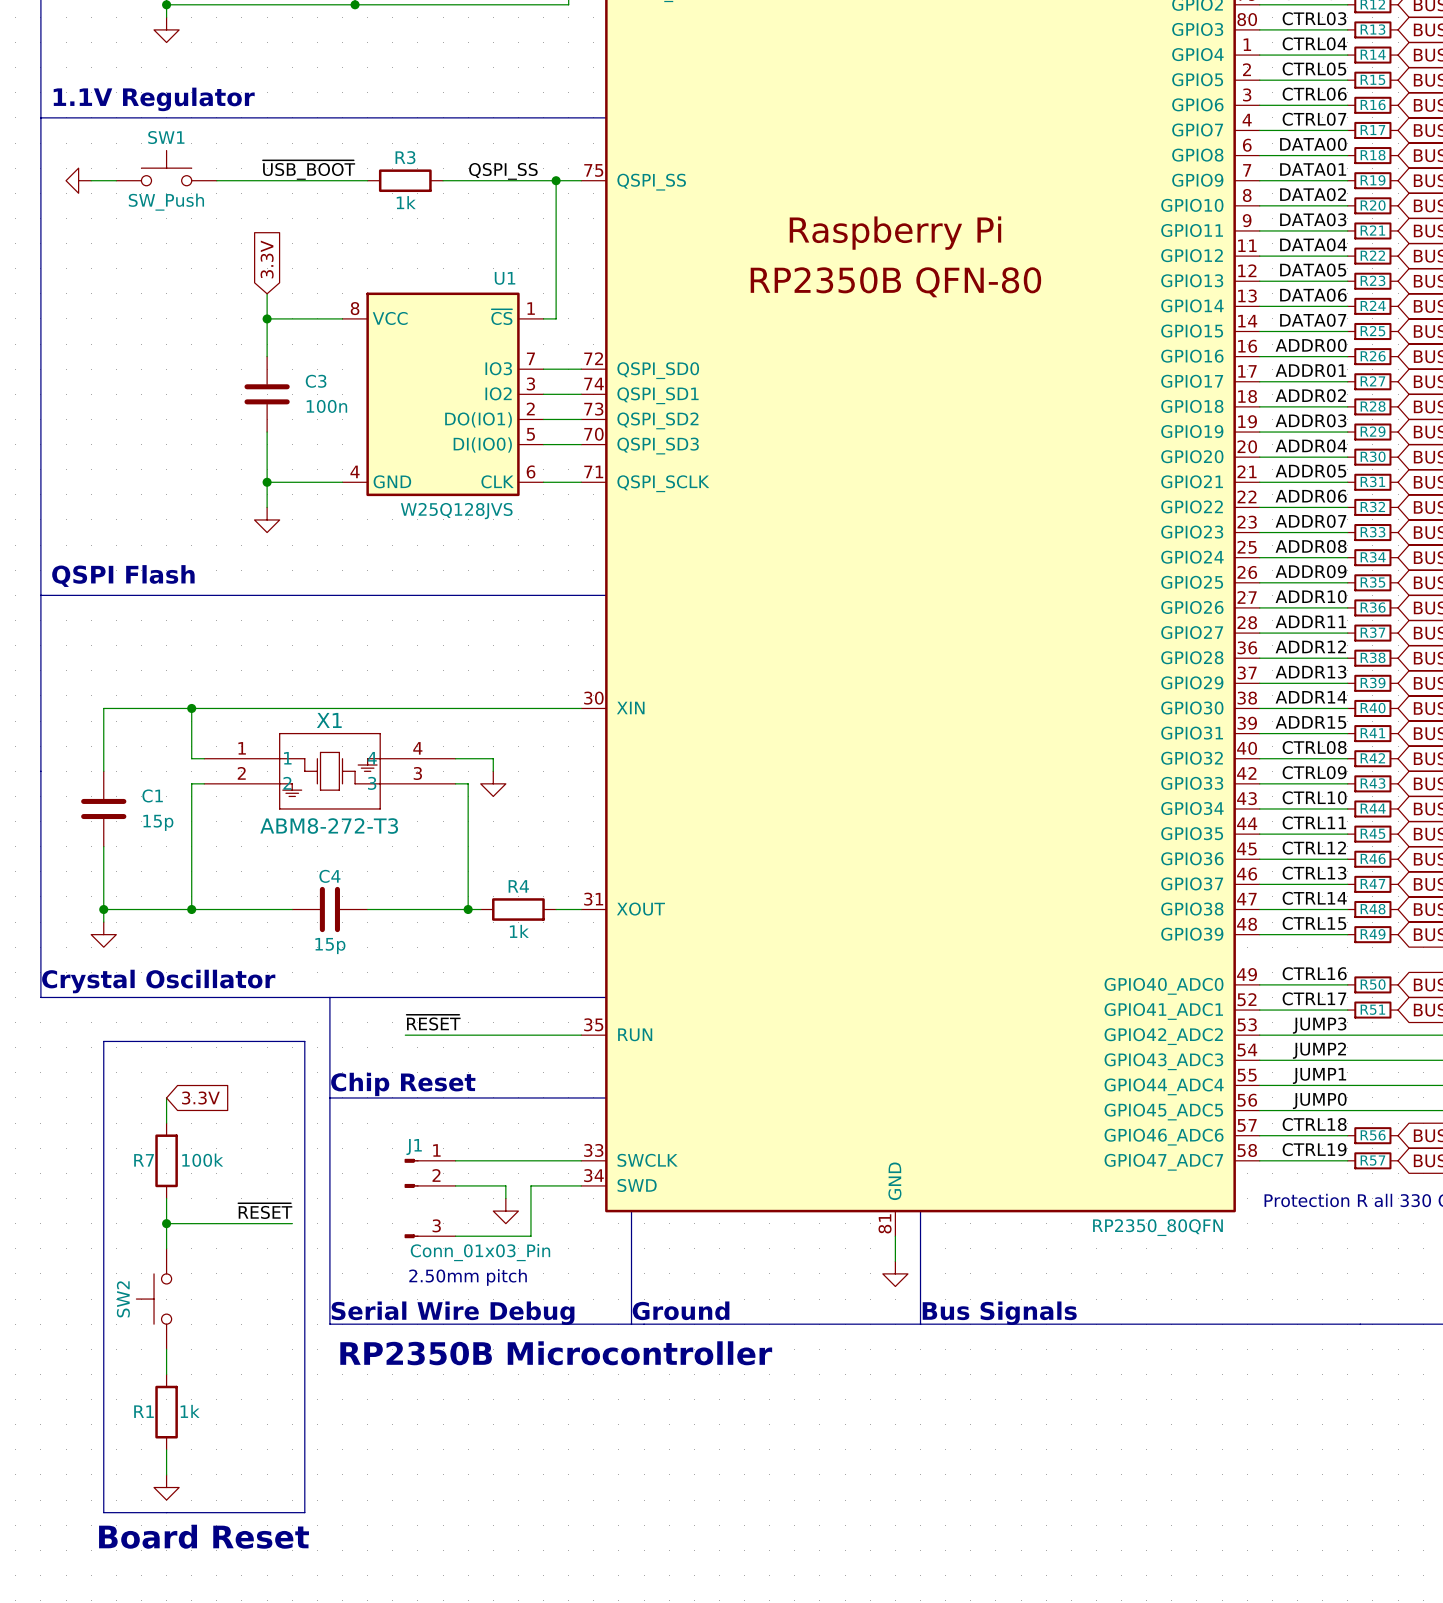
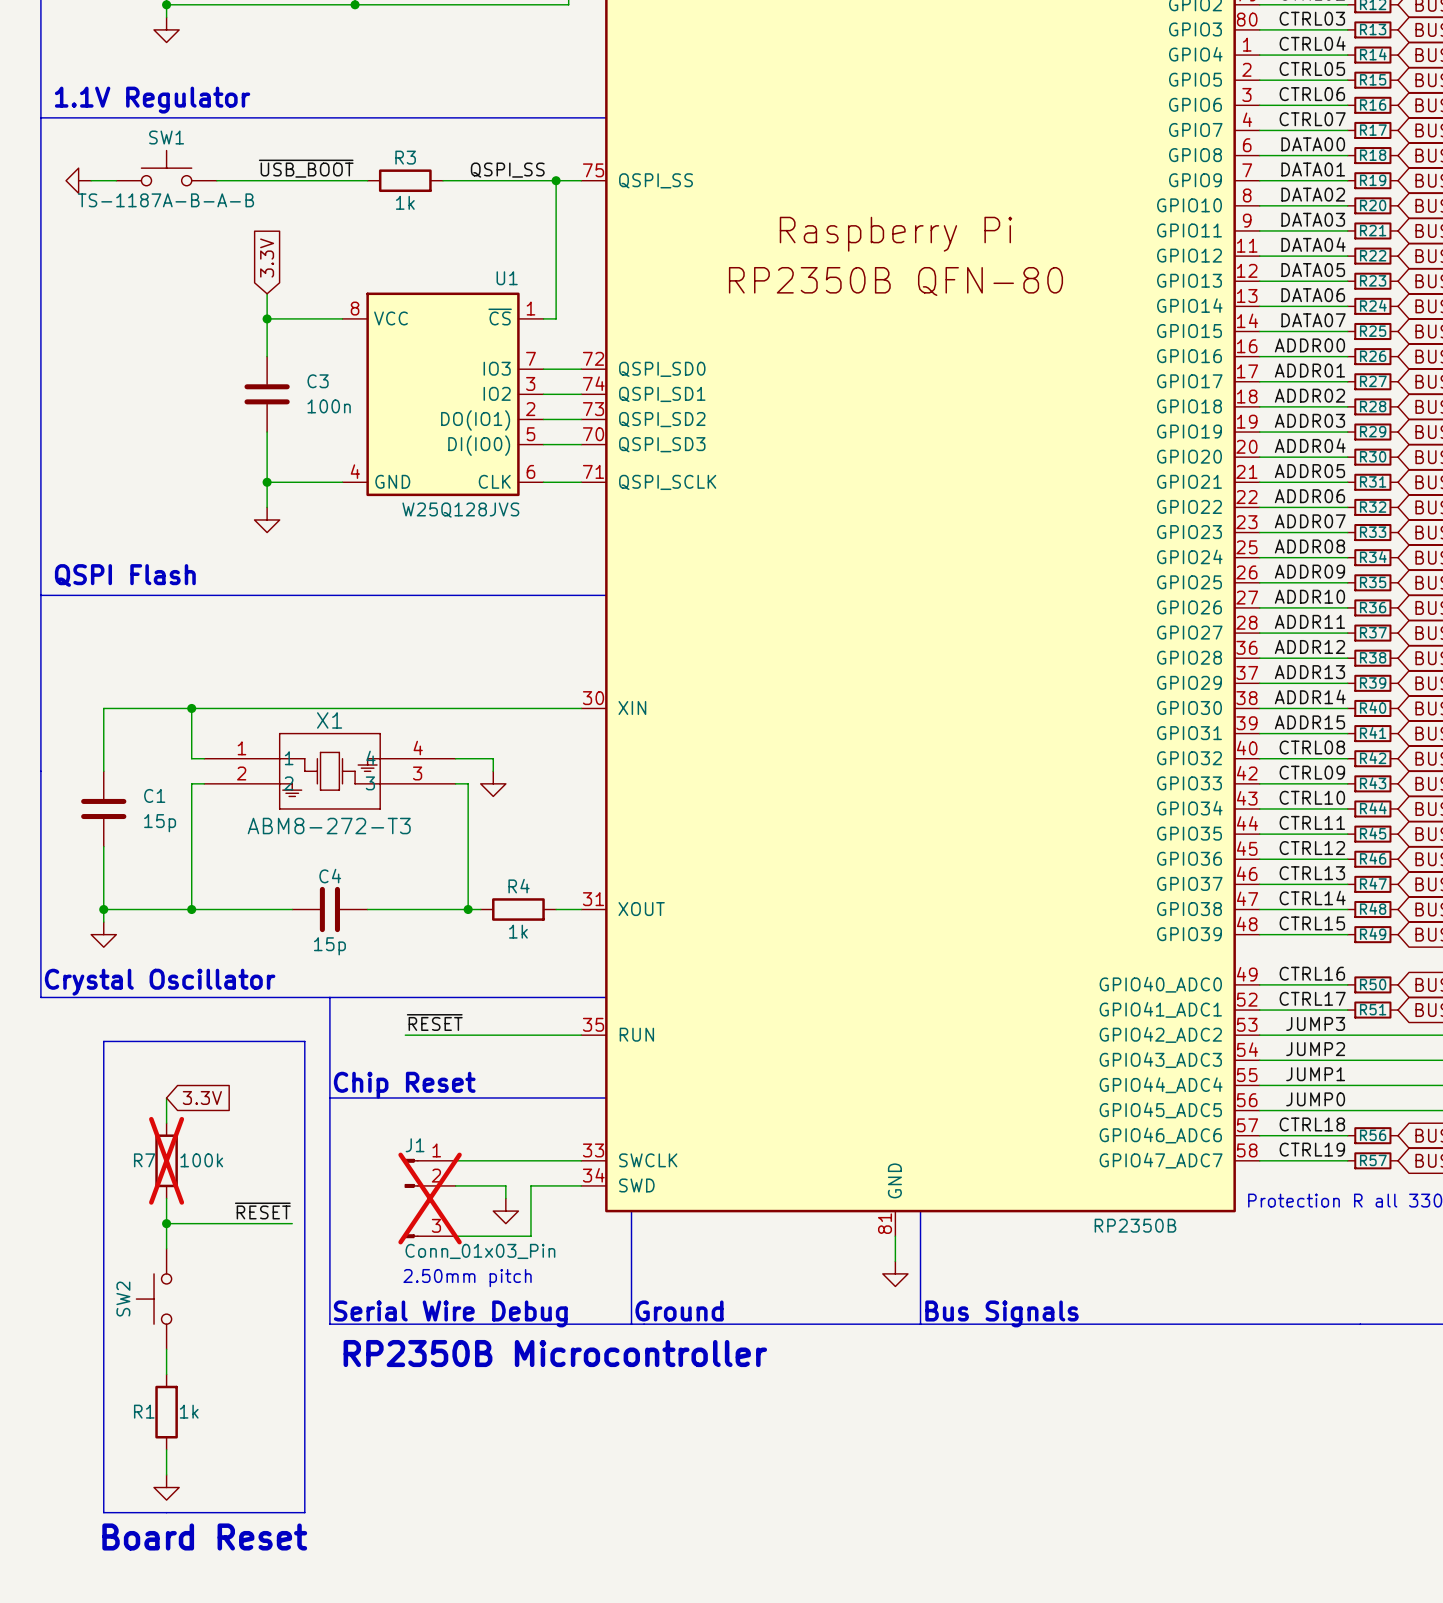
SW1 value: SW_Push (166, 202) -> TS-1187A-B-A-B (165, 200)
R7 do-not-place cross: none -> (166, 1160)
J1 do-not-place cross: none -> (430, 1198)
part value: RP2350_80QFN (1157, 1227) -> RP2350B (1135, 1225)

